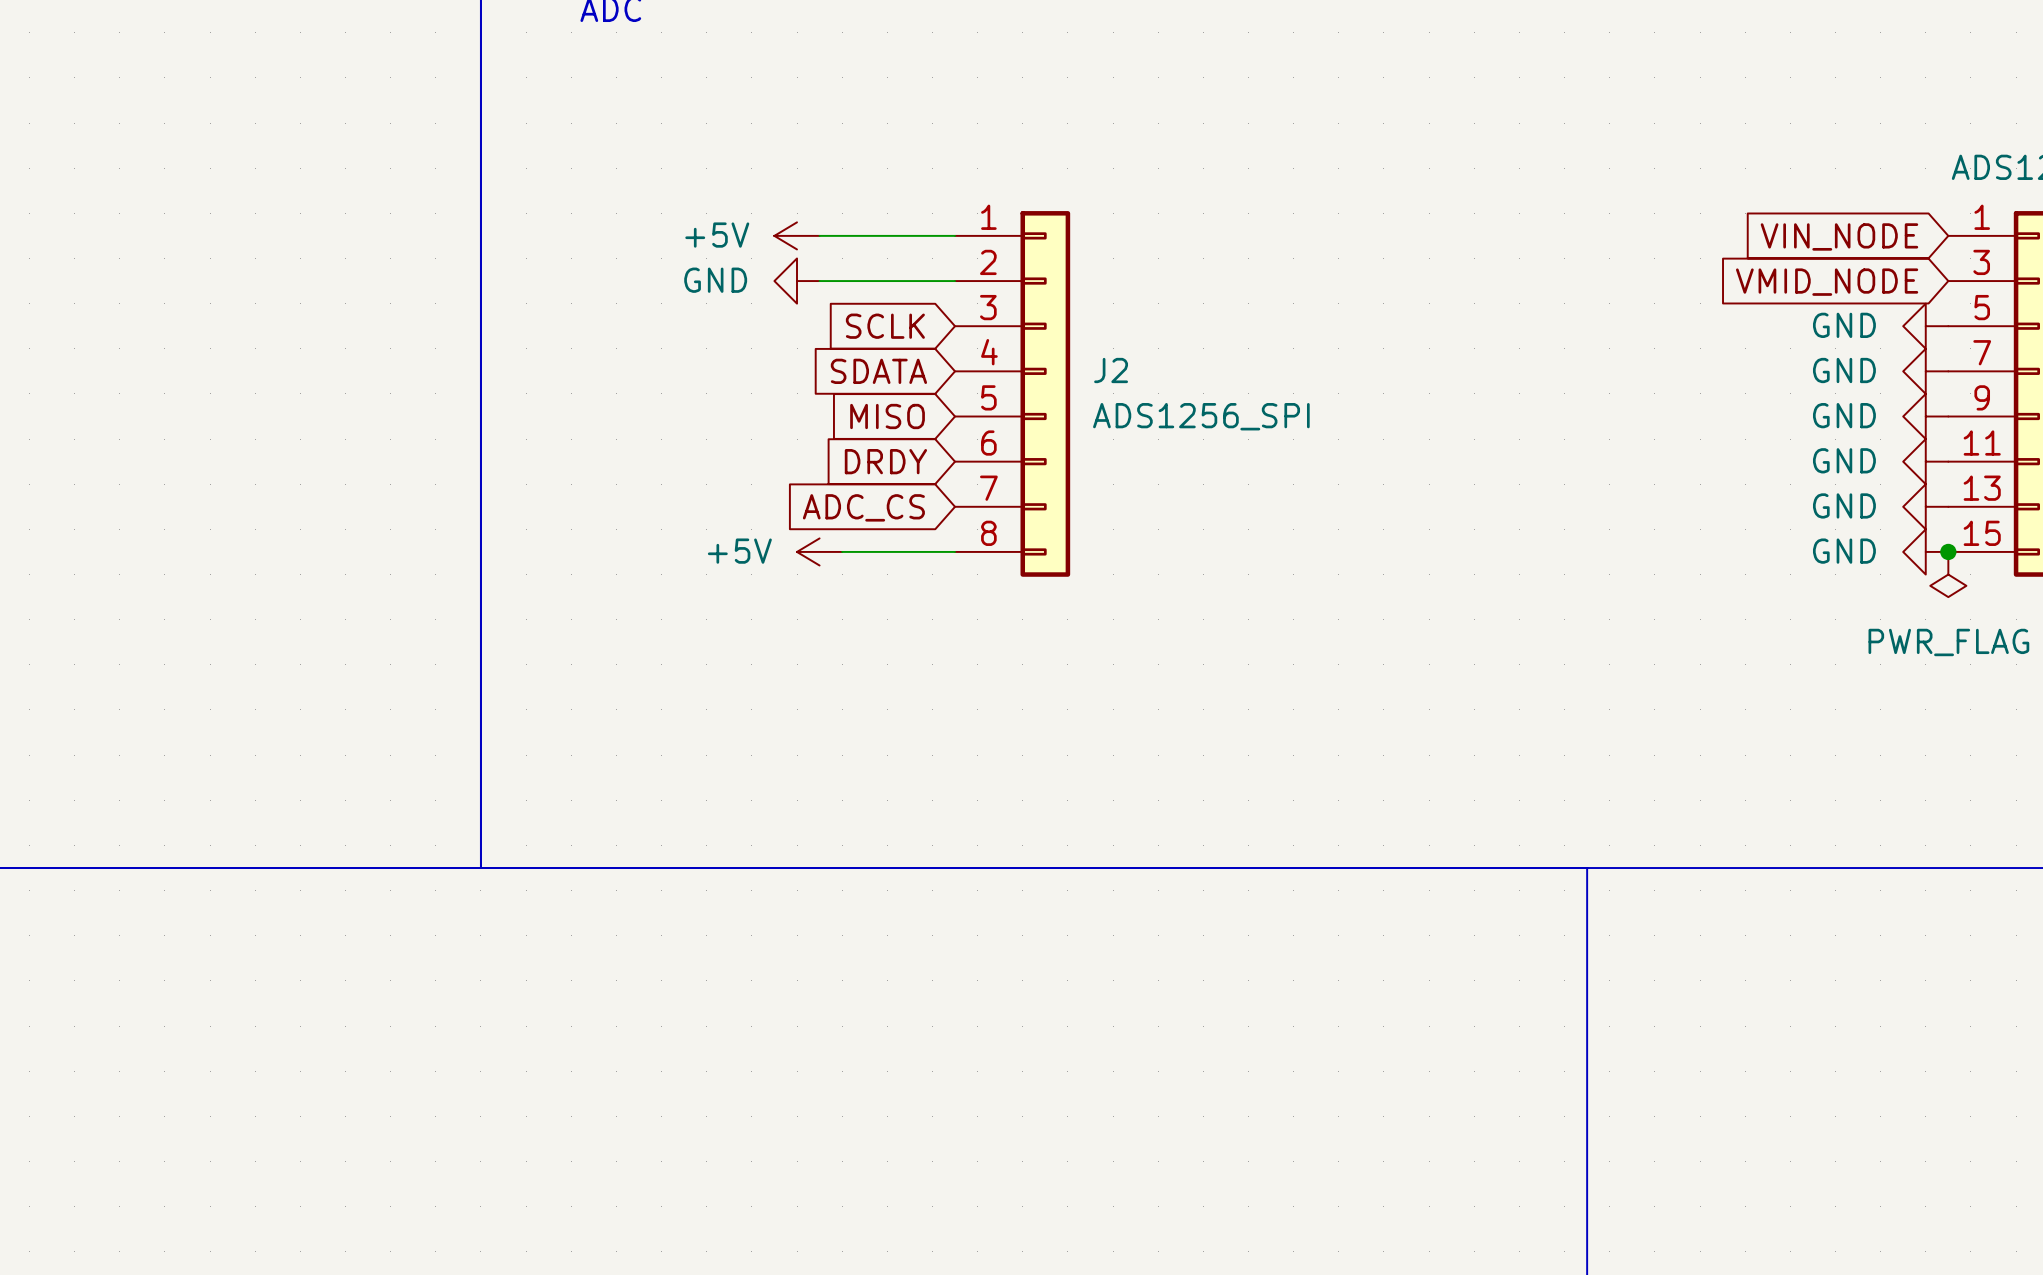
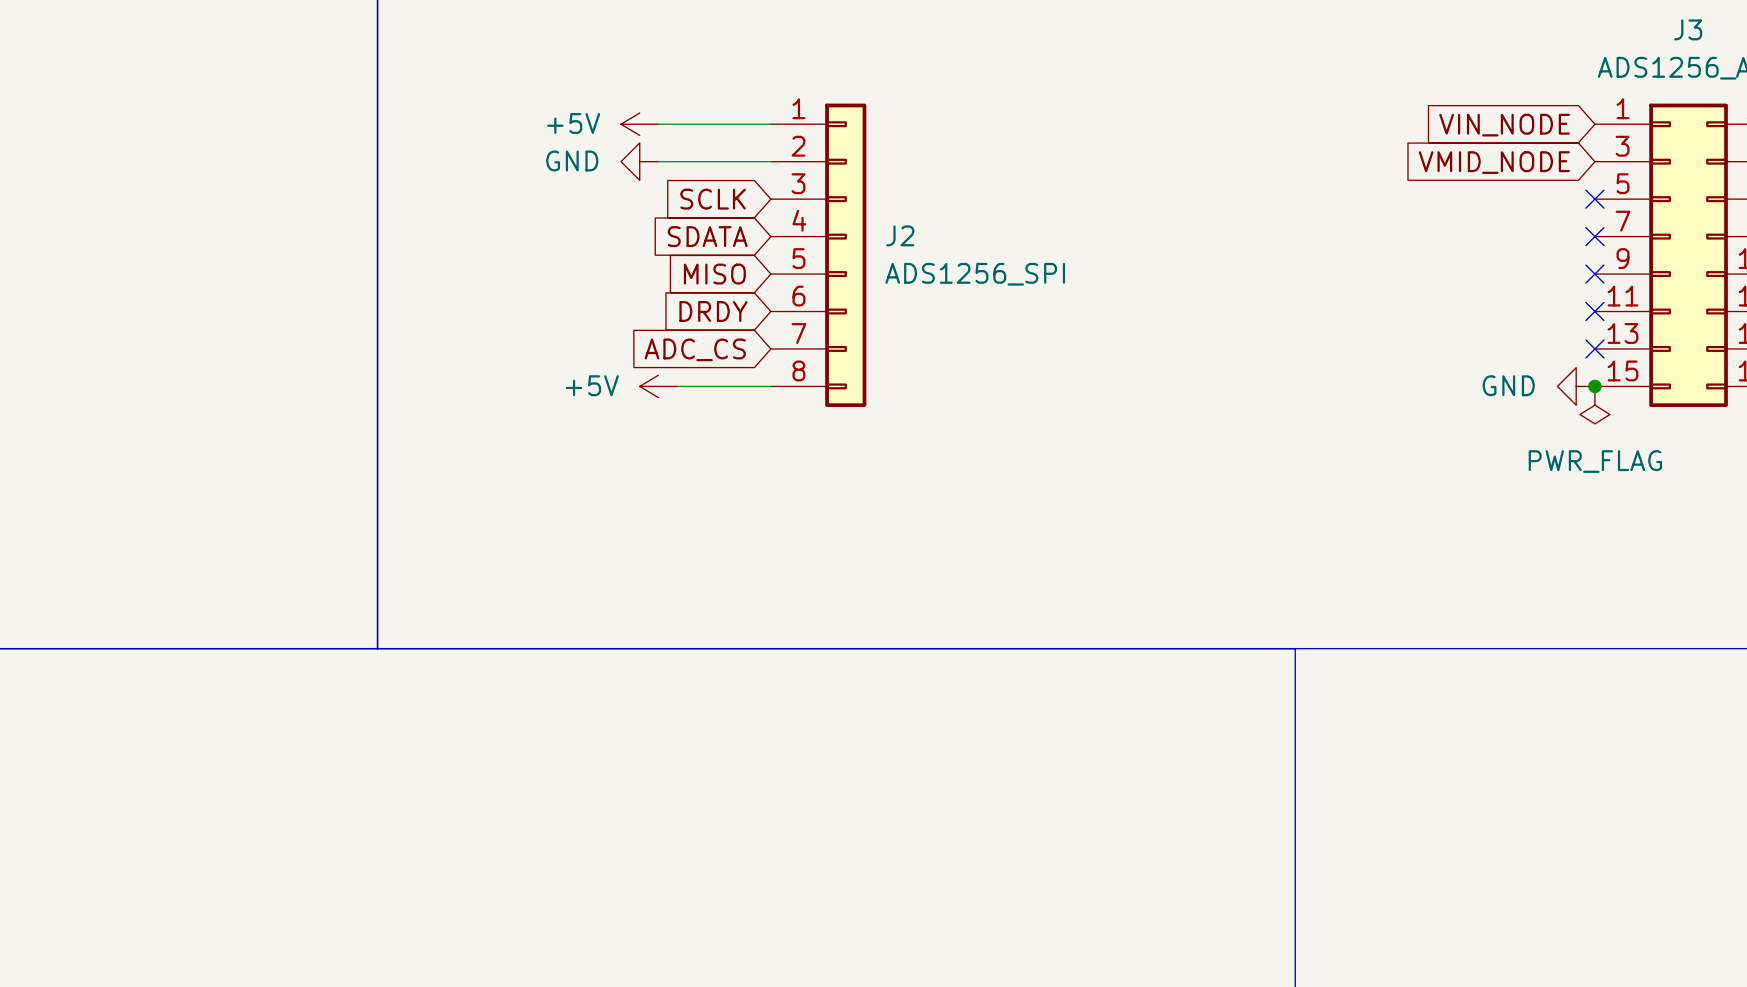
power symbol: GND (1925, 326) -> none
no-connect mark: none -> (1594, 199)
power symbol: GND (1925, 371) -> none
no-connect mark: none -> (1594, 236)
power symbol: GND (1925, 416) -> none
no-connect mark: none -> (1594, 274)
power symbol: GND (1925, 461) -> none
no-connect mark: none -> (1594, 311)
power symbol: GND (1925, 506) -> none
no-connect mark: none -> (1594, 348)

